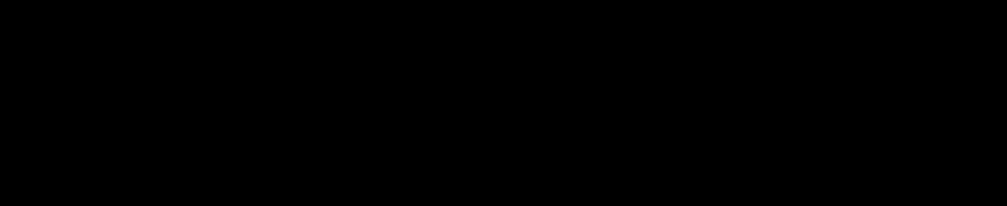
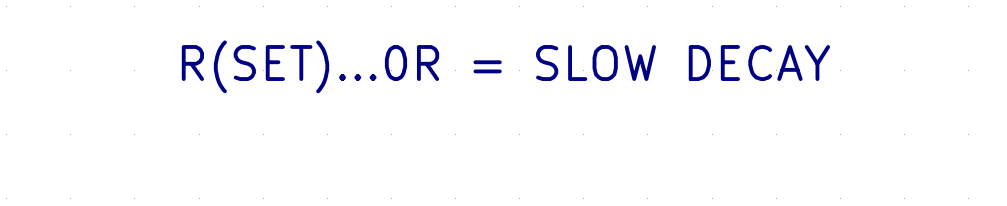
text: none -> R(SET)...0R = SLOW DECAY (505, 66)

